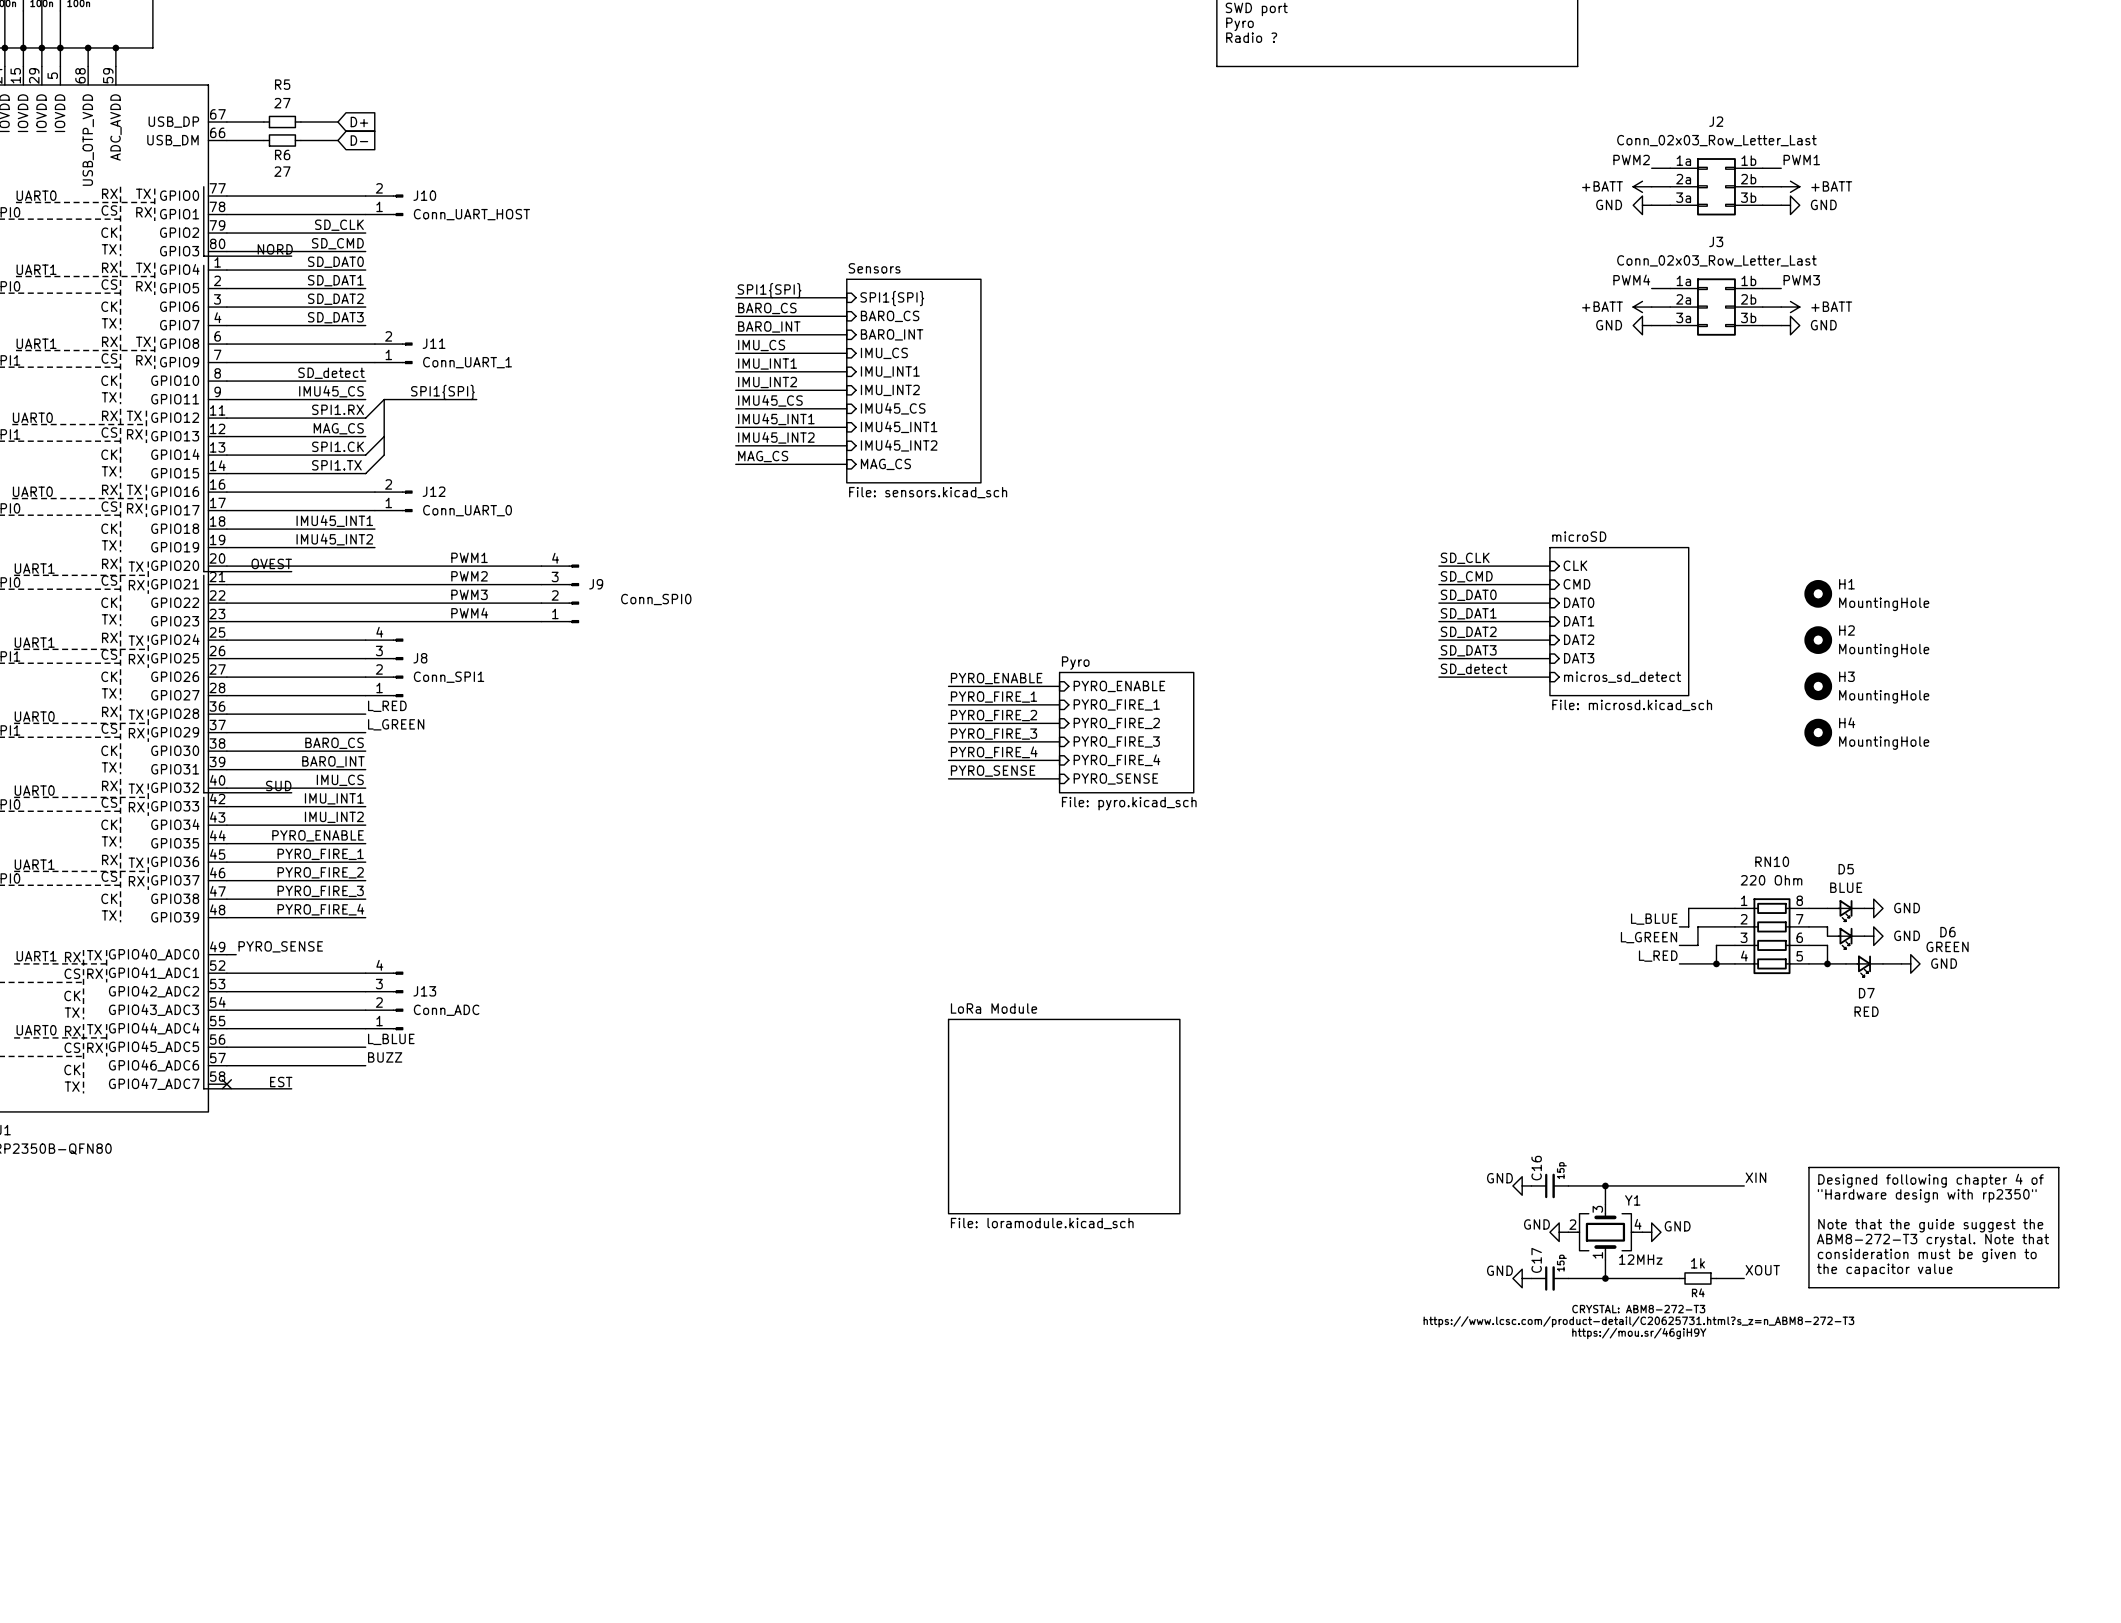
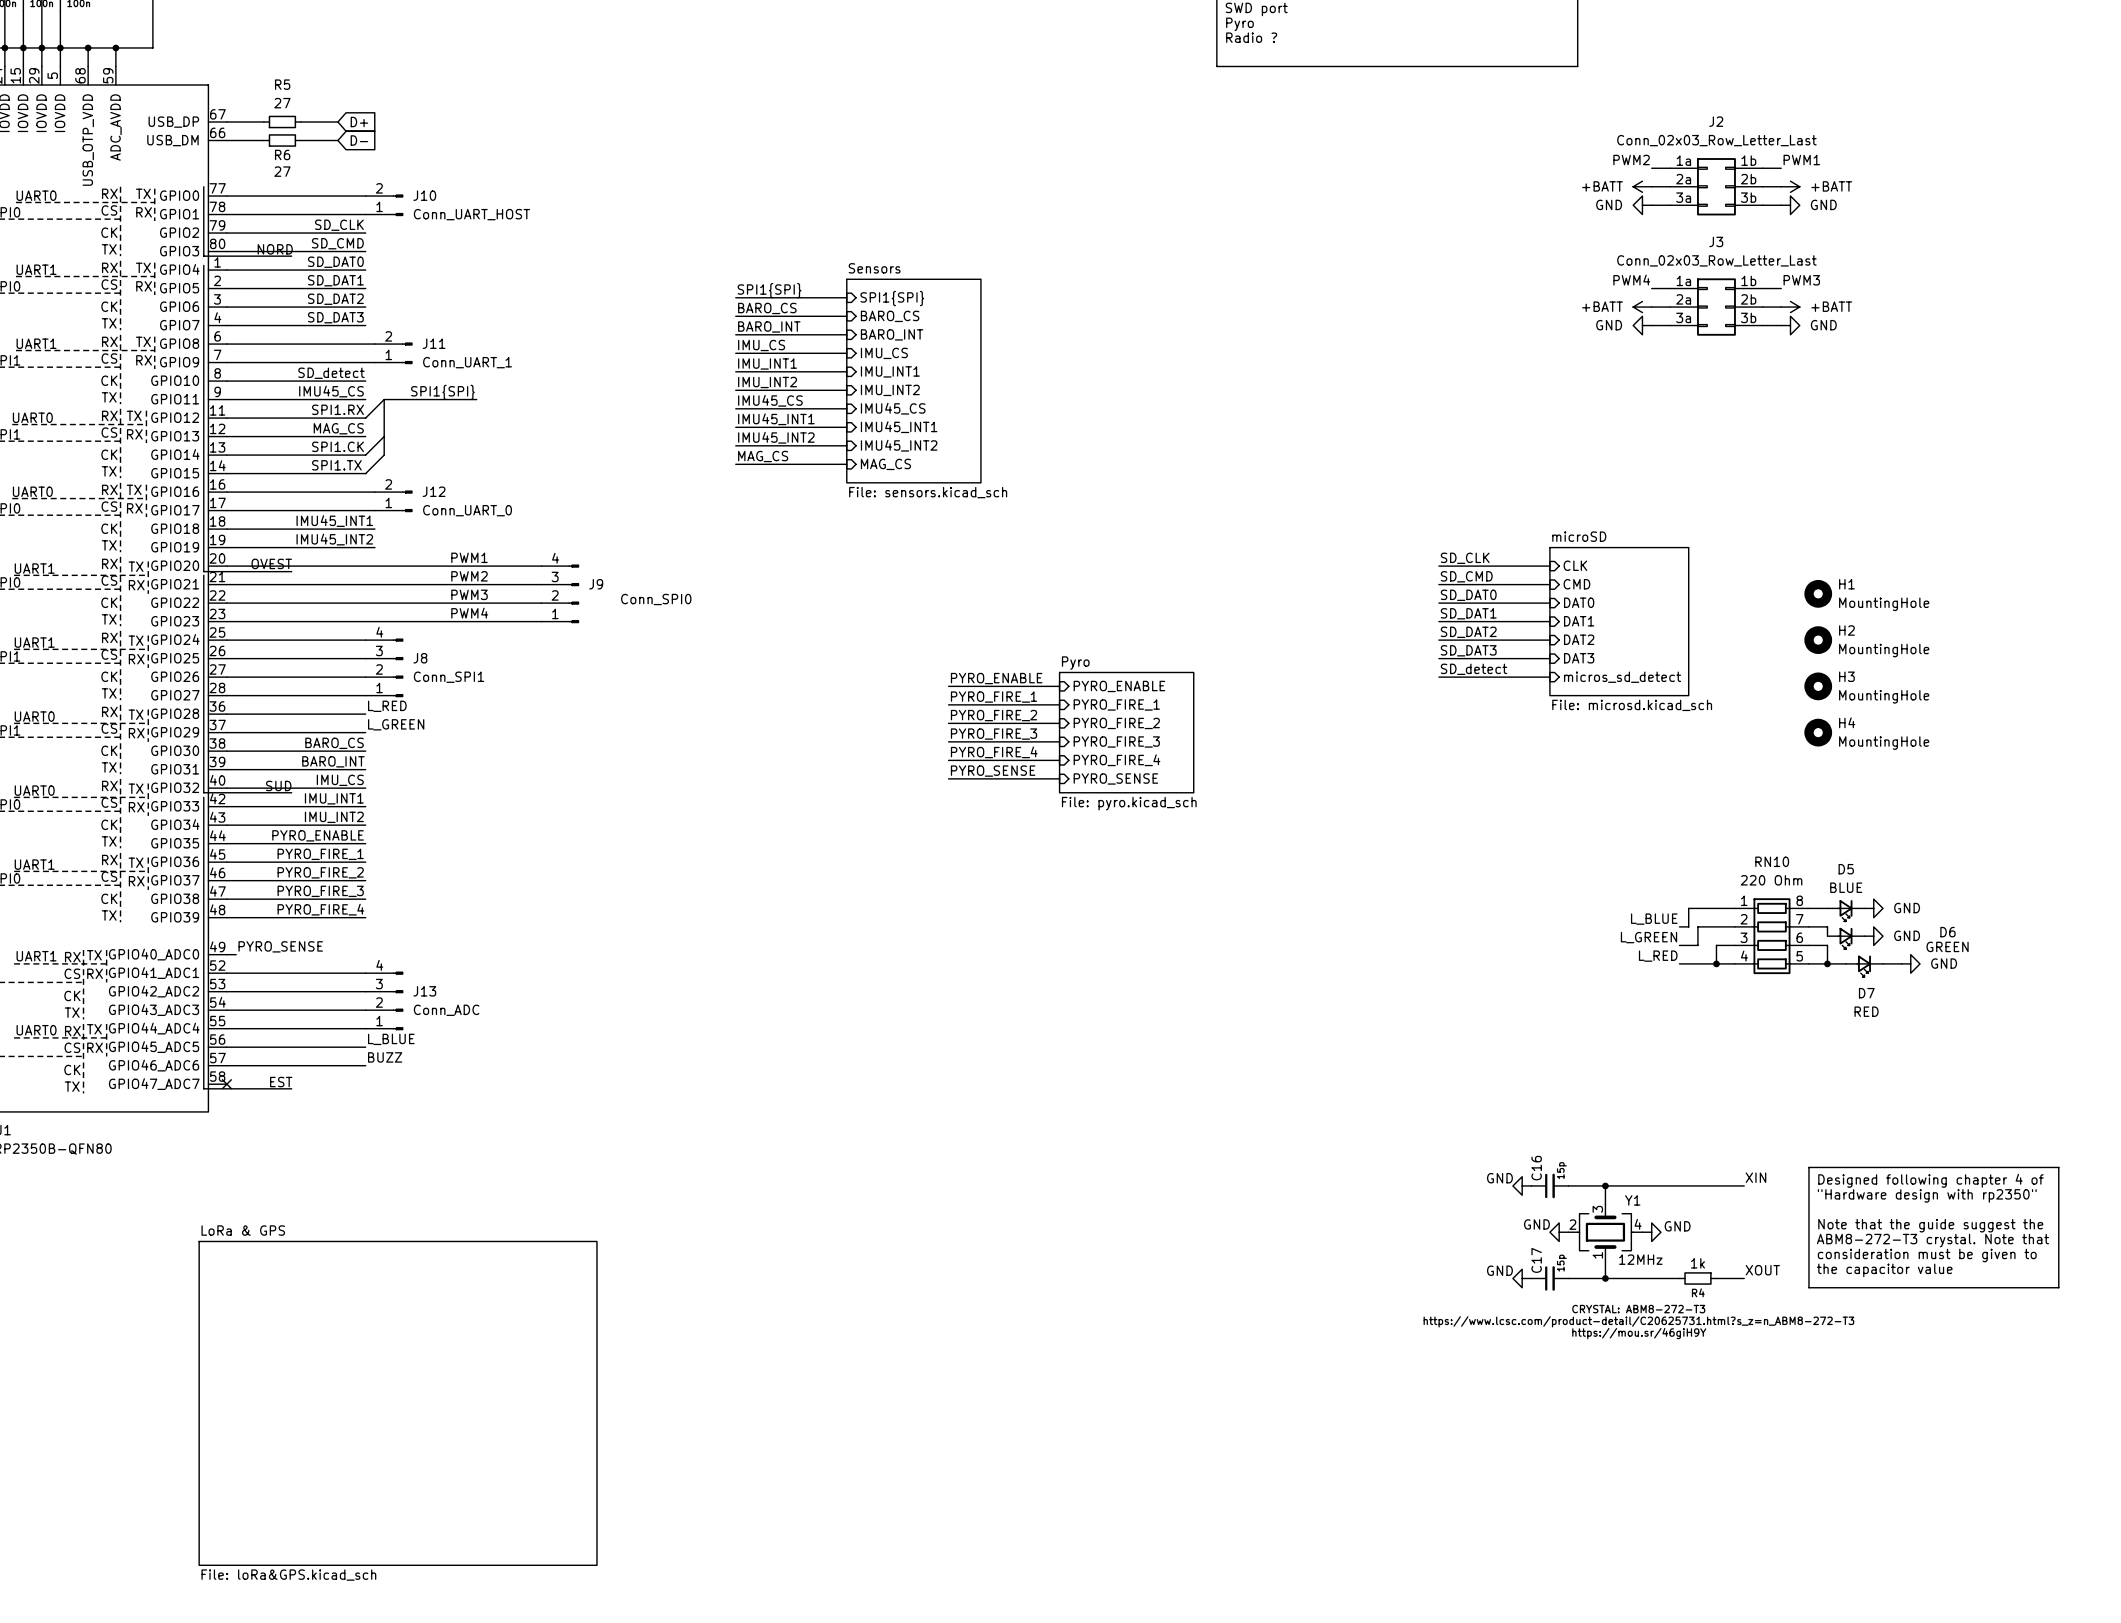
sheet LoRa Module: File: loramodule.kicad_sch (1064, 1116) -> none
sheet LoRa & GPS: none -> File: loRa&GPS.kicad_sch (398, 1403)

